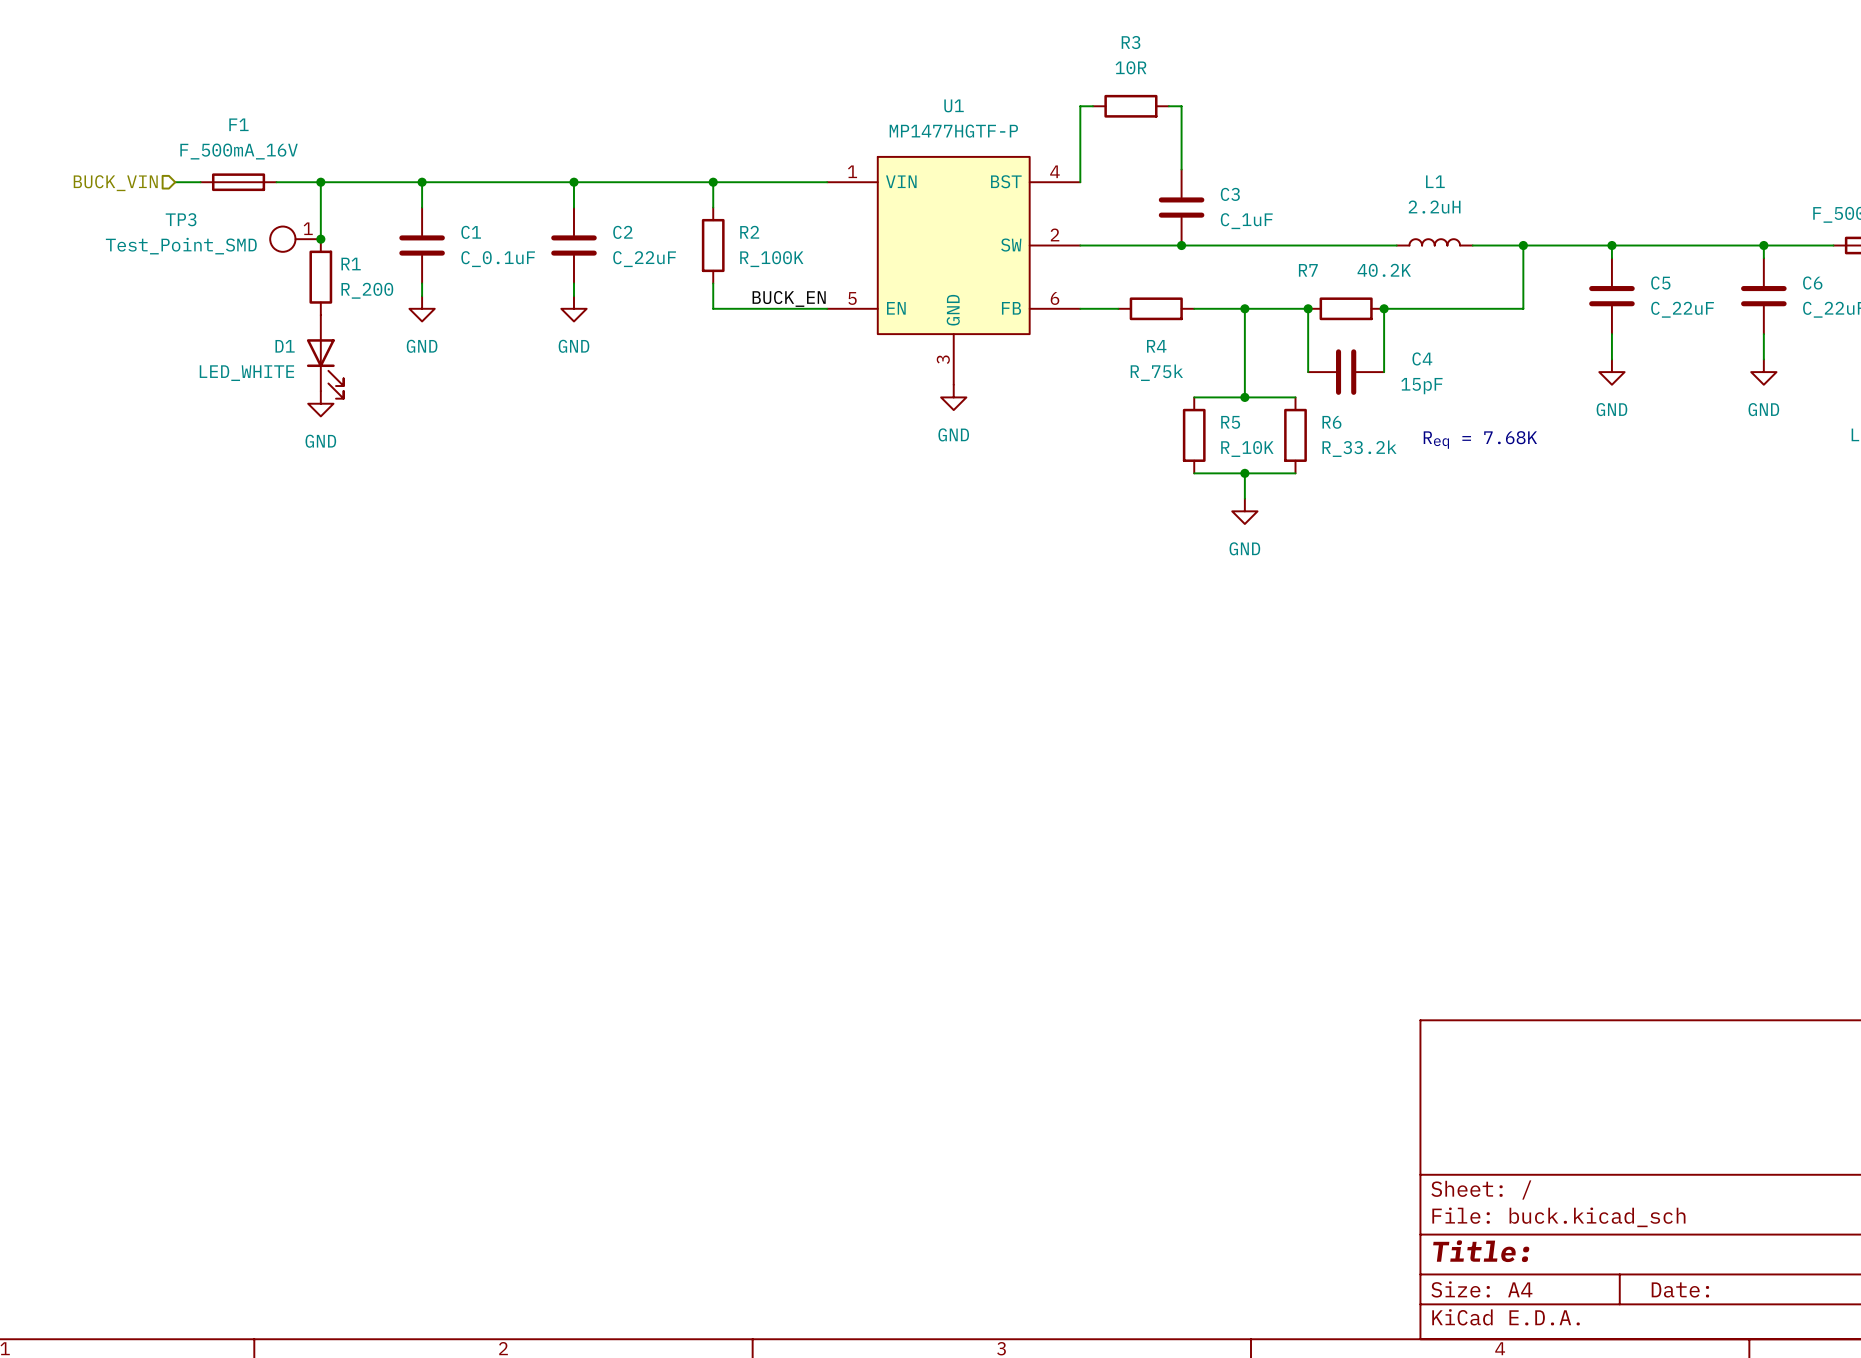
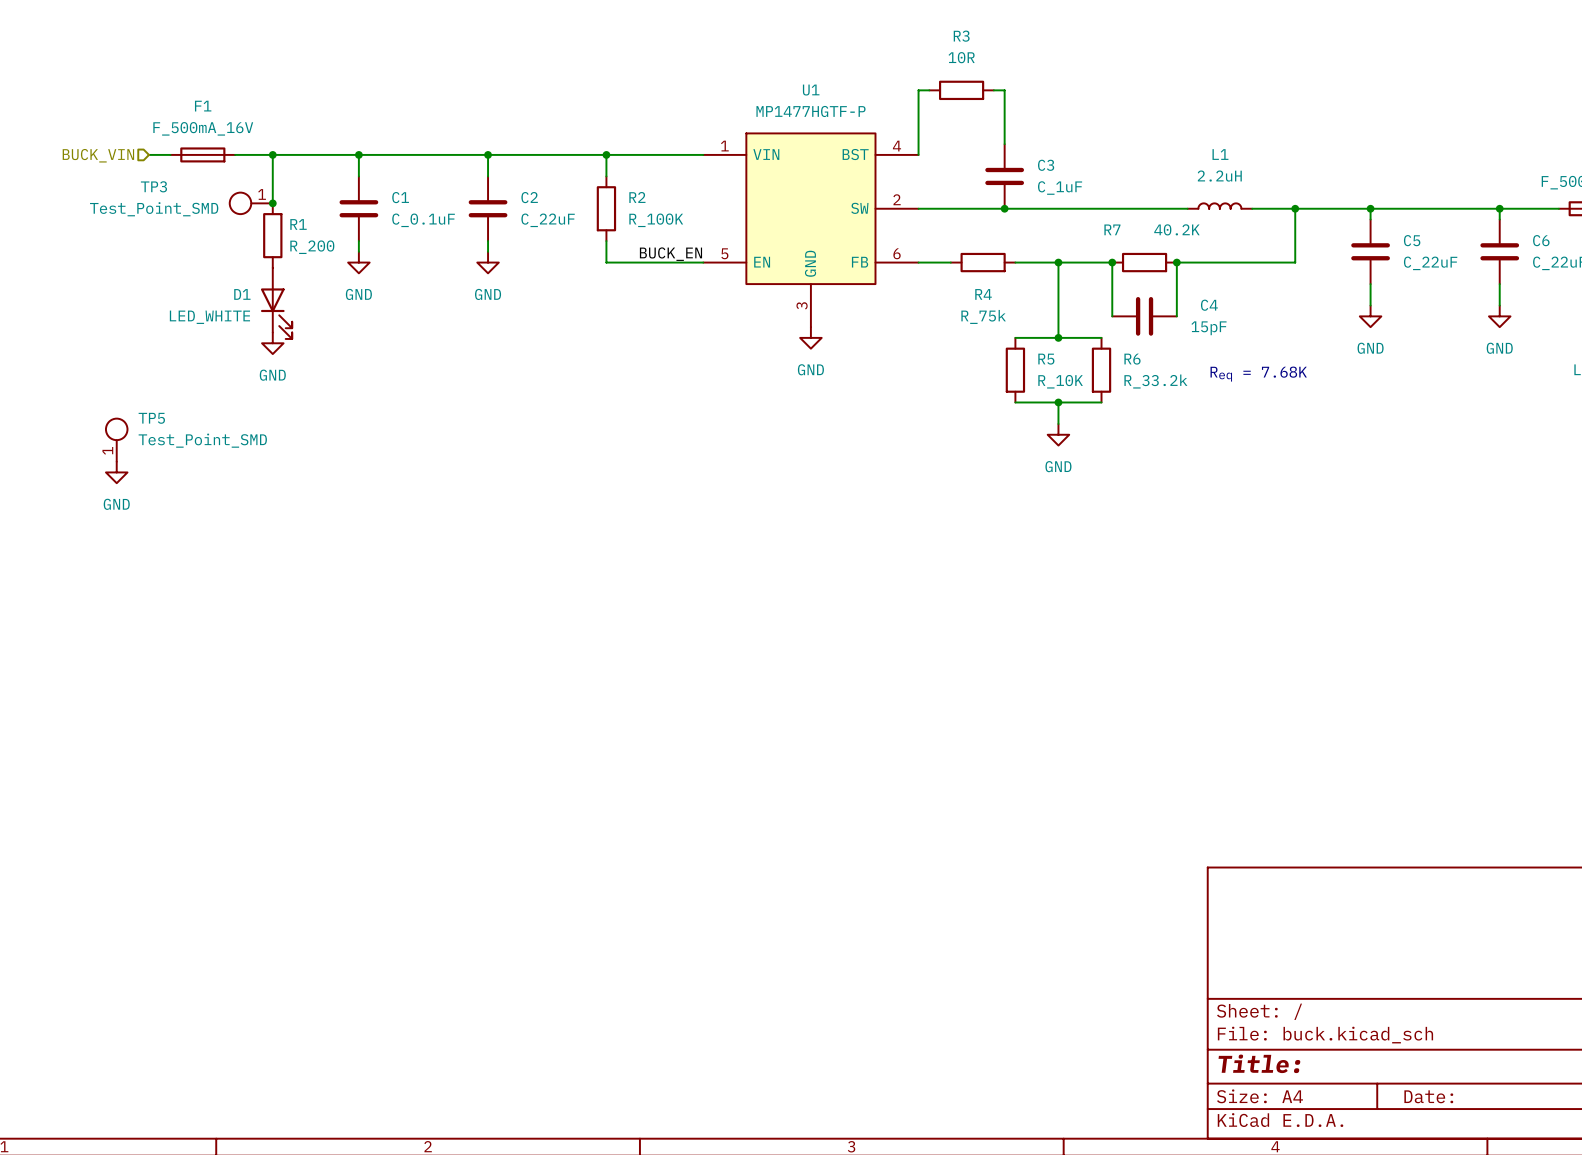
TP5: none -> Test_Point_SMD (116, 440)
power symbol: none -> GND (116, 472)

